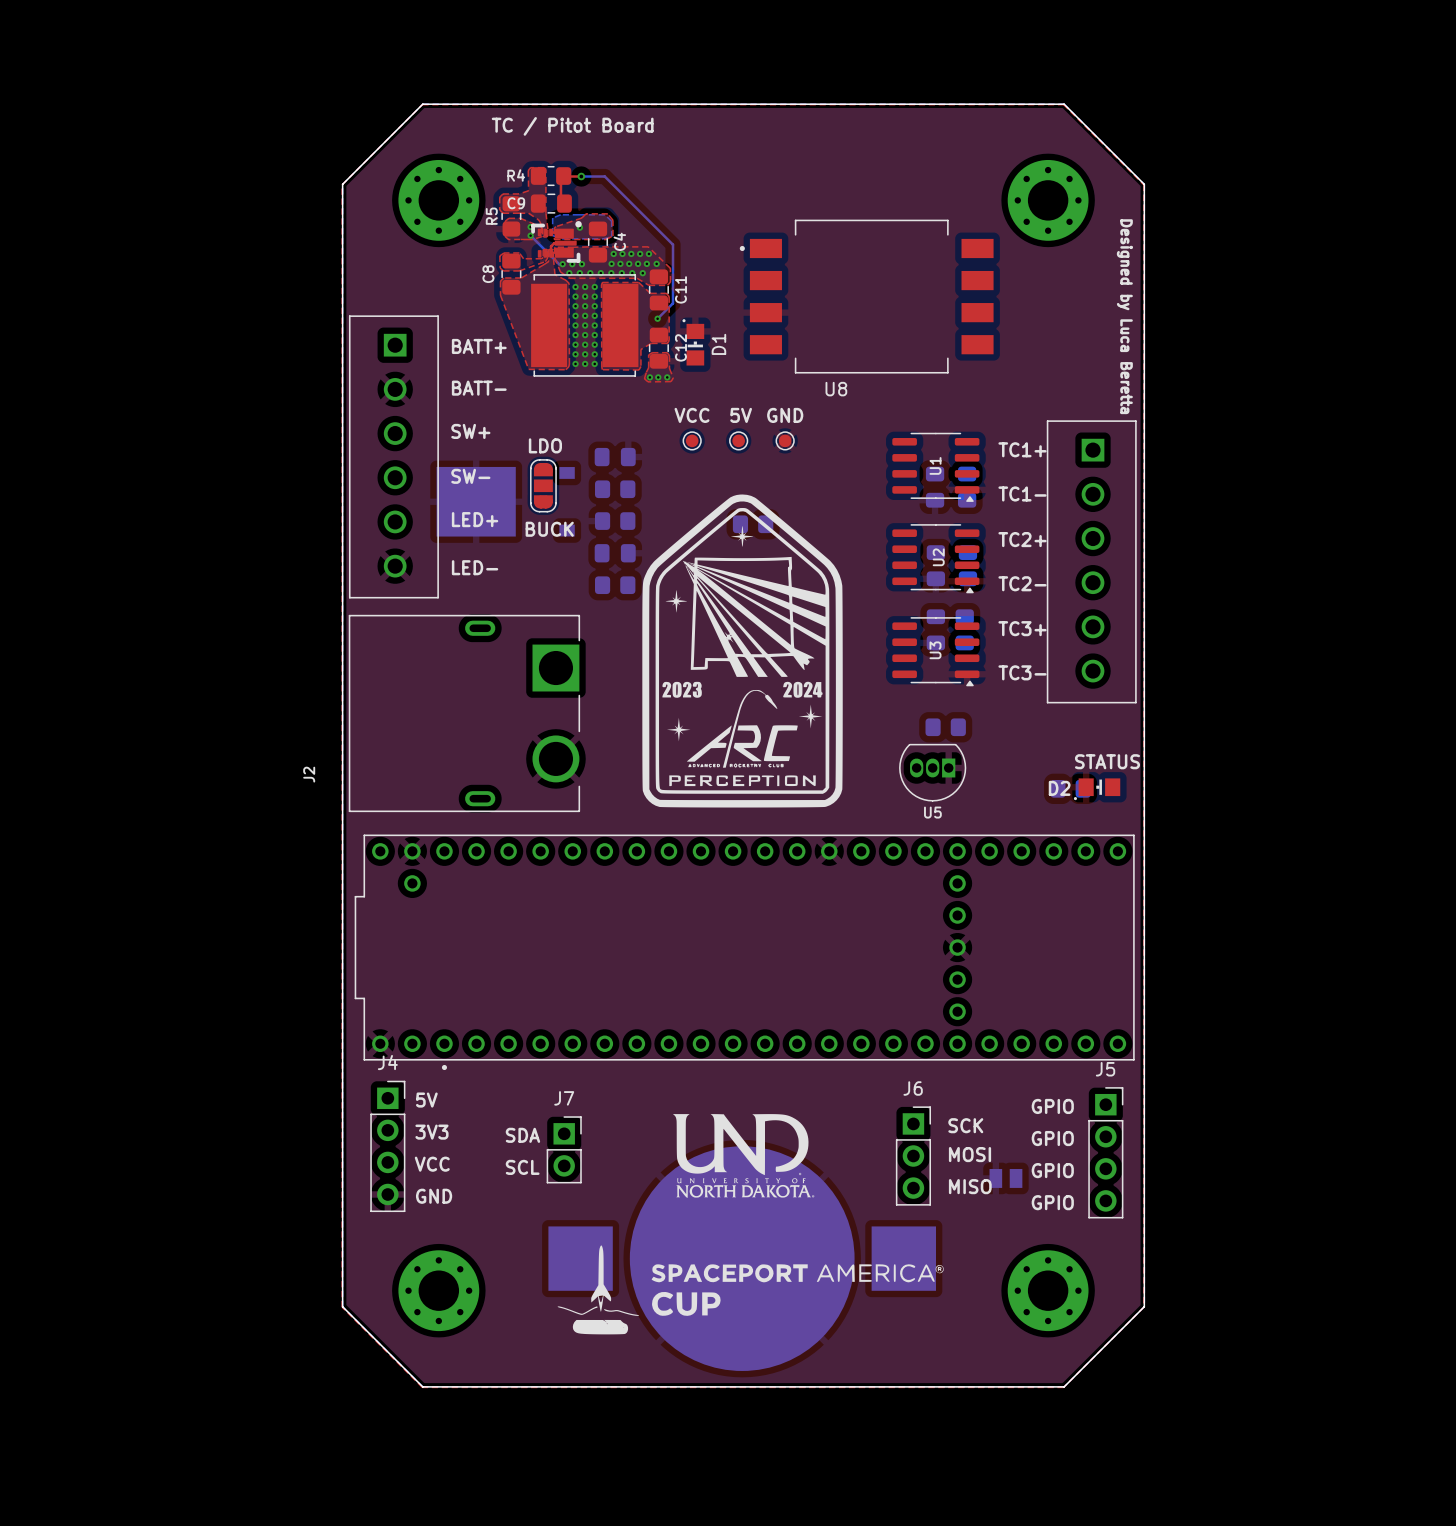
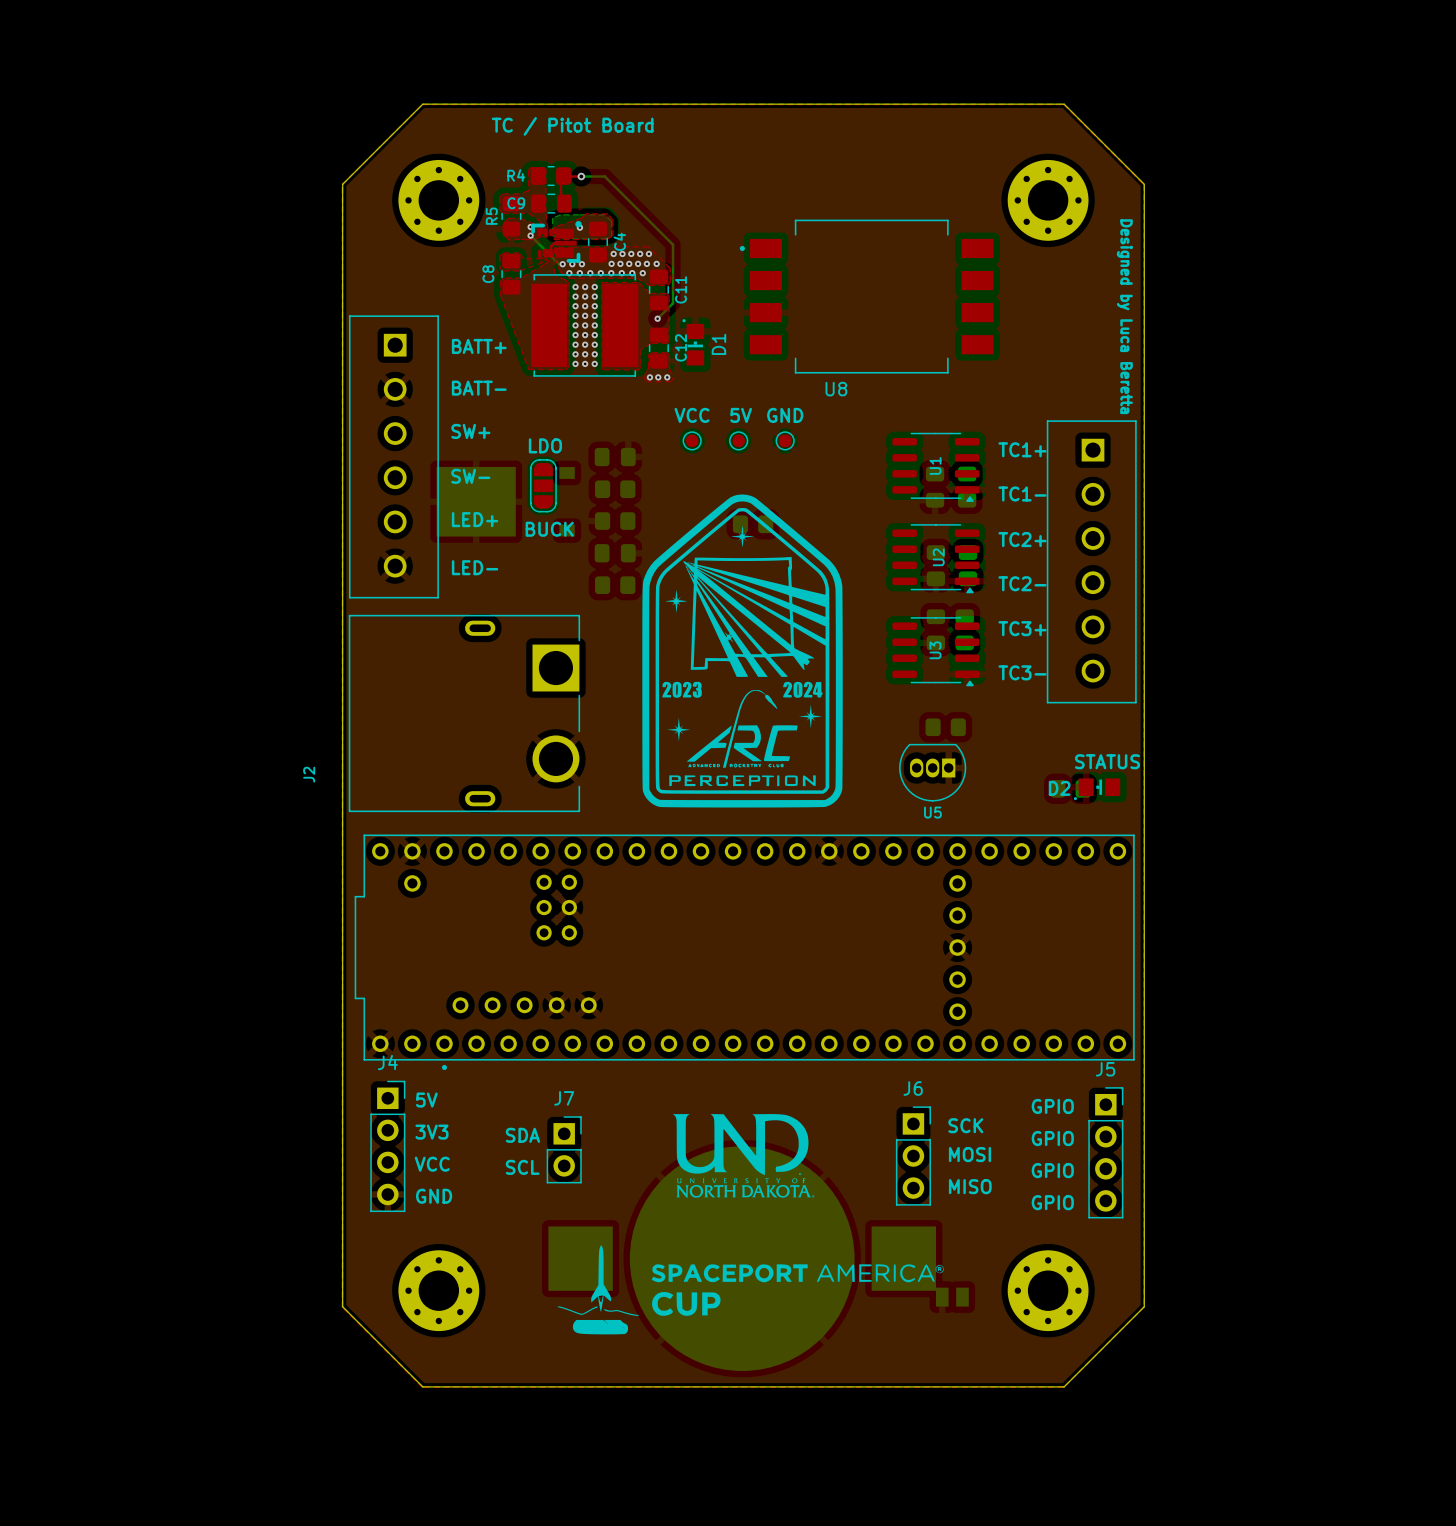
part footprint: [354, 834, 1135, 1071] -> [354, 834, 1135, 1071]
part position: (1005, 1178) -> (952, 1297)

